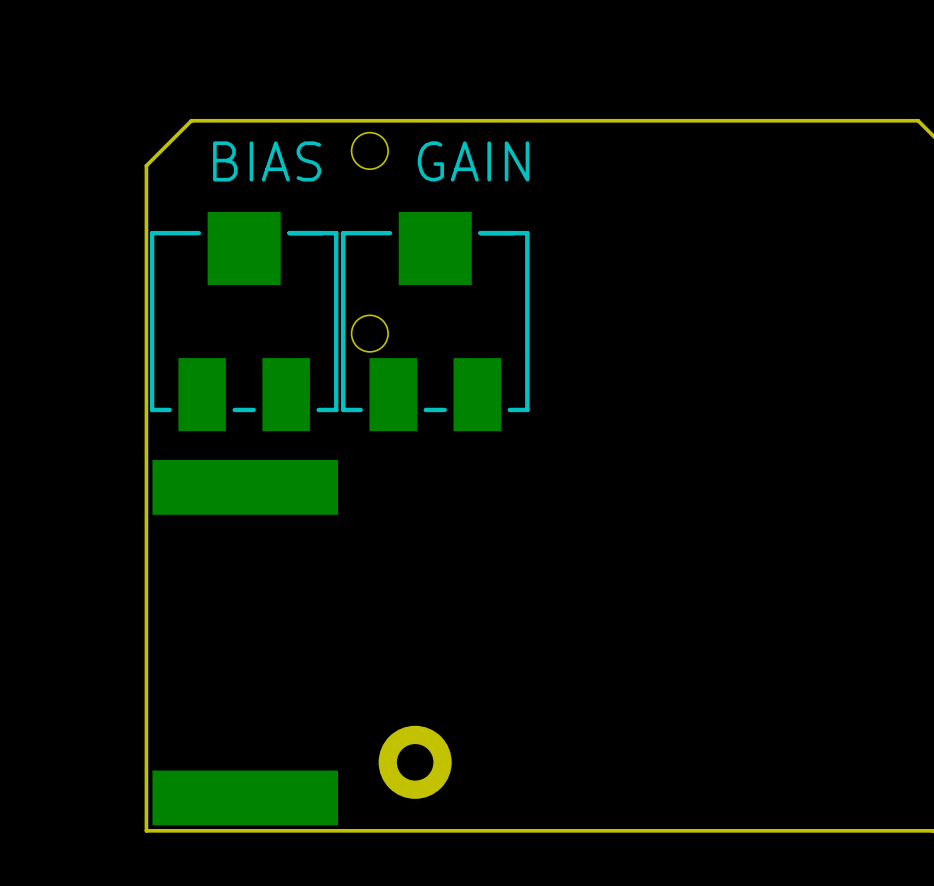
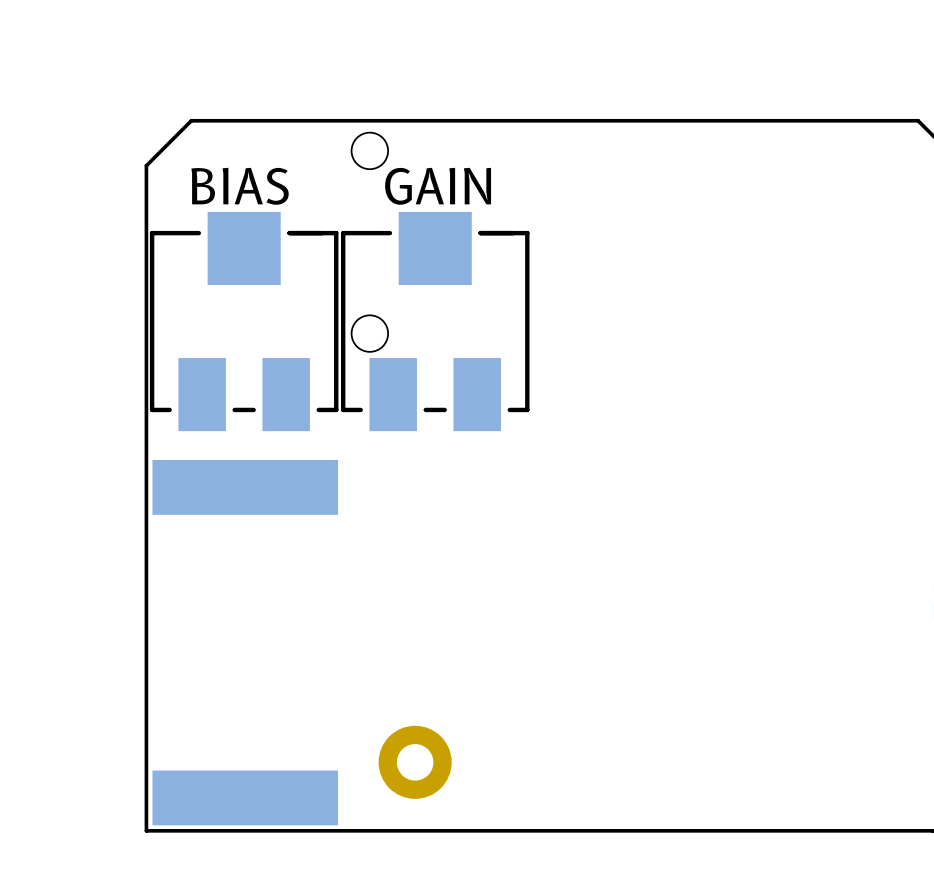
text position: BIAS (267, 161) -> BIAS (240, 186)
text position: GAIN (473, 161) -> GAIN (438, 186)

